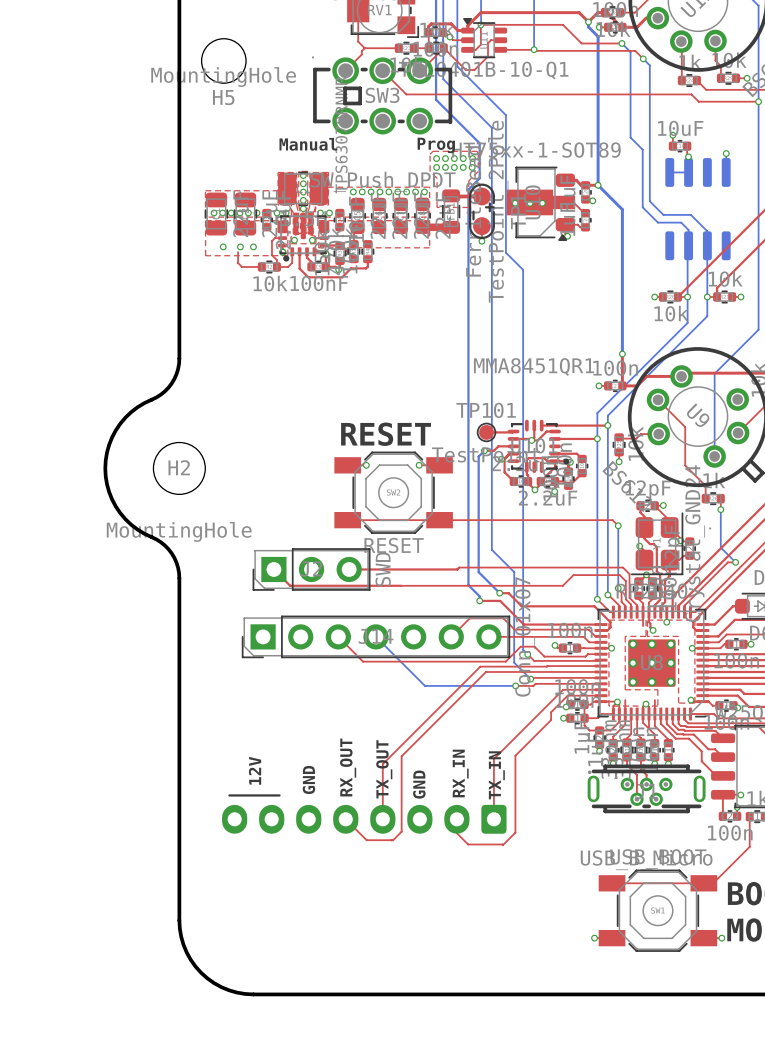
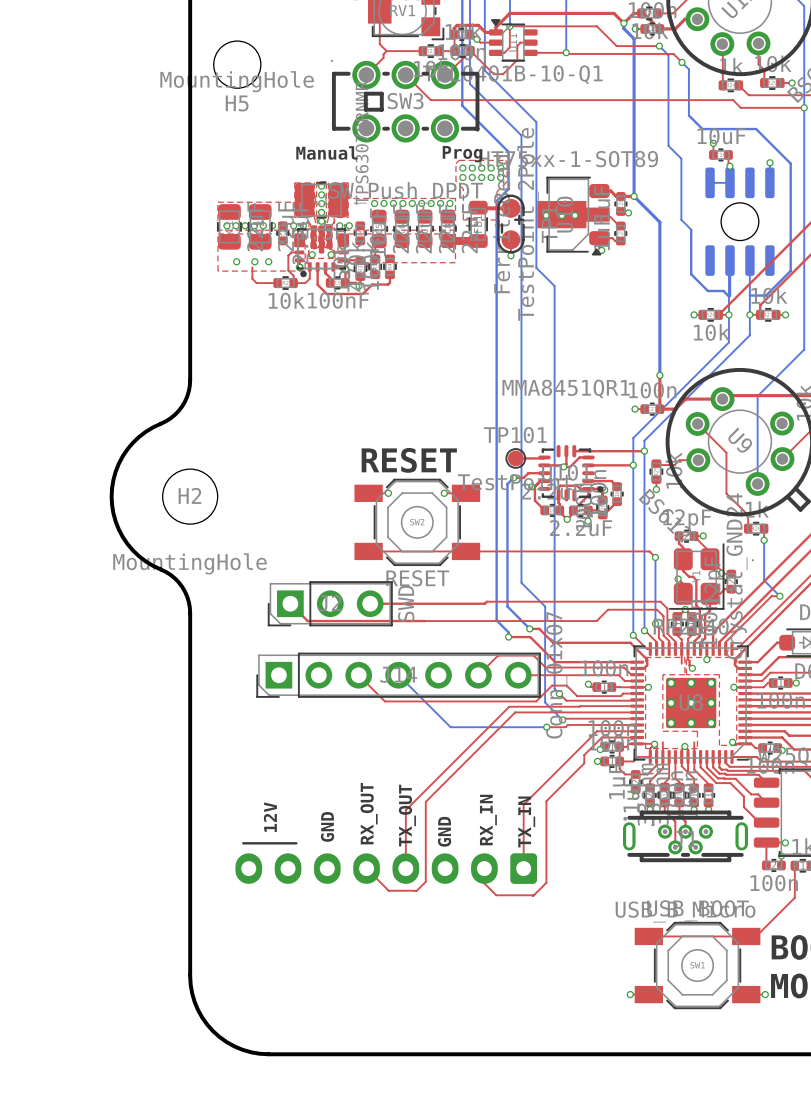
bottom track: (649, 108) (649, 201) (663, 214) (690, 214) (707, 231) (707, 245) -> (688, 115) (702, 129) (756, 129) (790, 163) (790, 270) (766, 295) (749, 295)
round board edge: none -> [720, 202, 760, 241]
bottom track: (651, 216) (657, 222) (681, 222) (688, 229) (688, 245) -> (691, 229) (691, 274) (707, 290) (723, 290) (729, 295) (729, 260)

